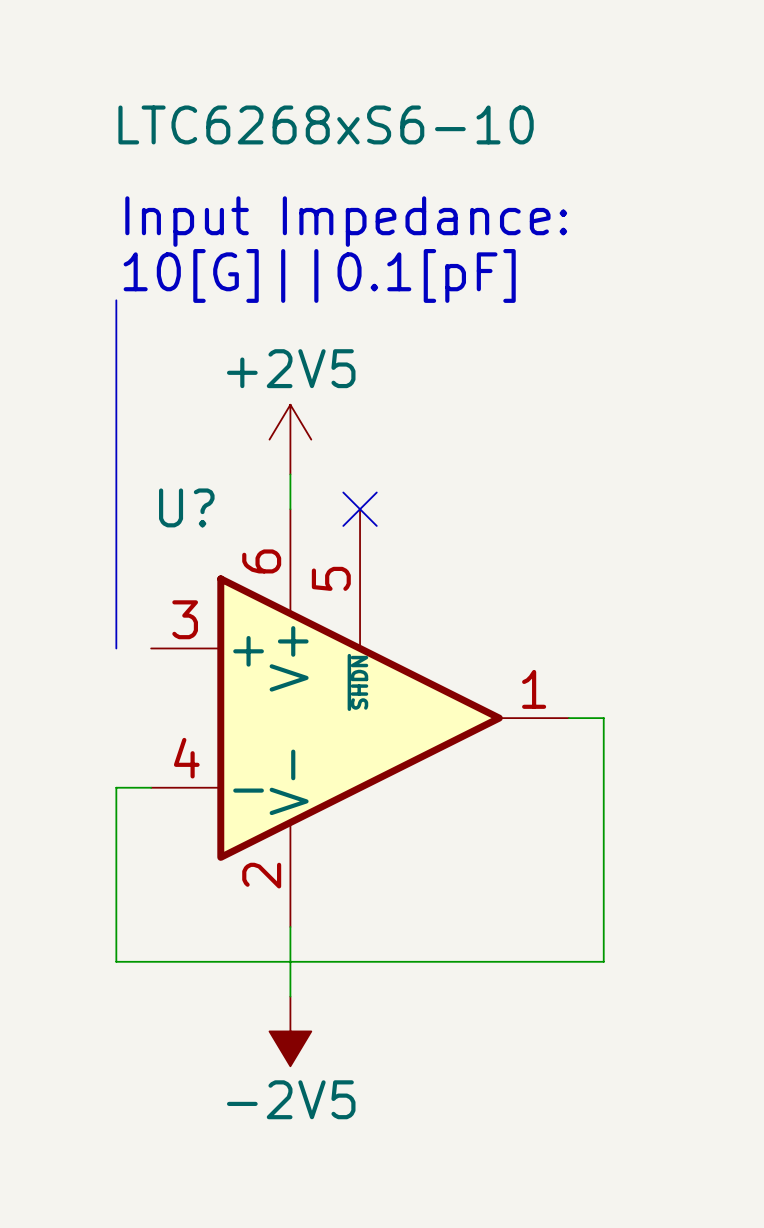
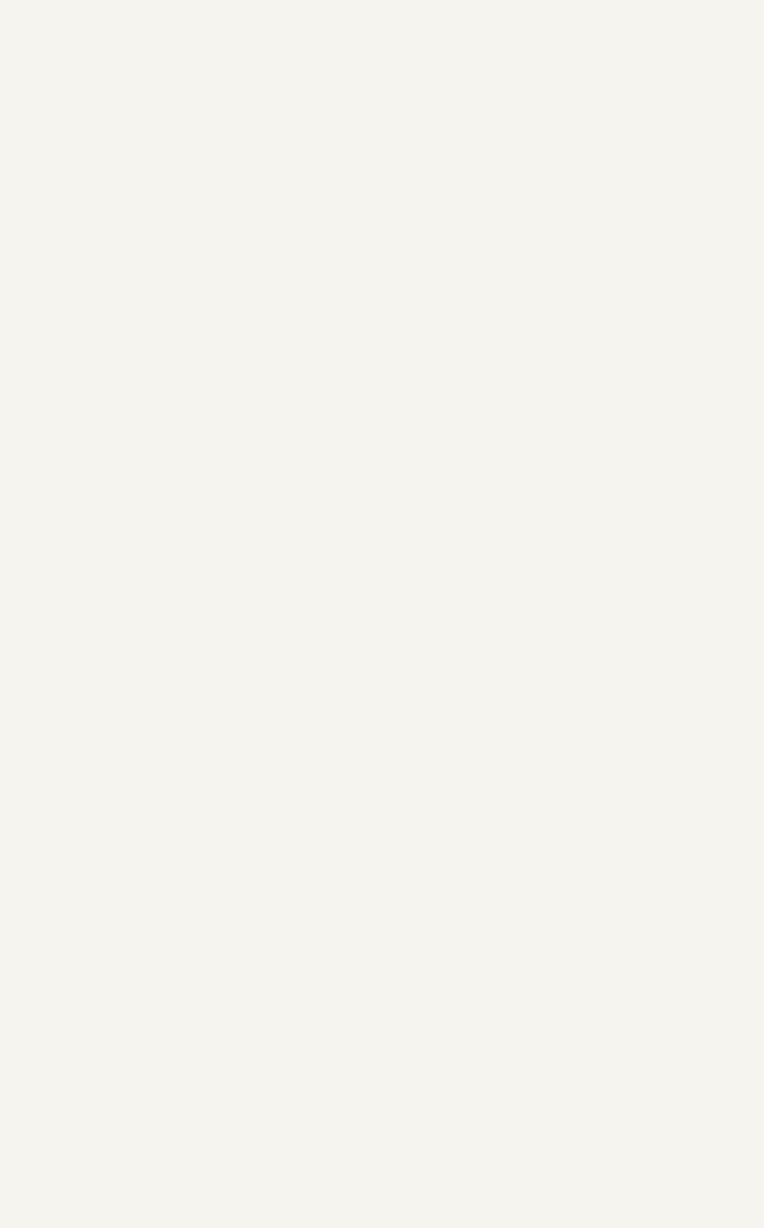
text: Input Impedance: (346, 221) -> none
text: 10[G]||0.1[pF] (319, 275) -> none
line: (116, 300) (116, 648) -> none
power symbol: +2V5 (290, 439) -> none
wire: (290, 474) (290, 509) -> none
no-connect mark: (360, 509) -> none
U?: LTC6268xS6-10 (360, 718) -> none
wire: (568, 718) (603, 718) (603, 961) (116, 961) (116, 787) (151, 787) -> none
wire: (290, 926) (290, 996) -> none
power symbol: -2V5 (290, 1031) -> none

